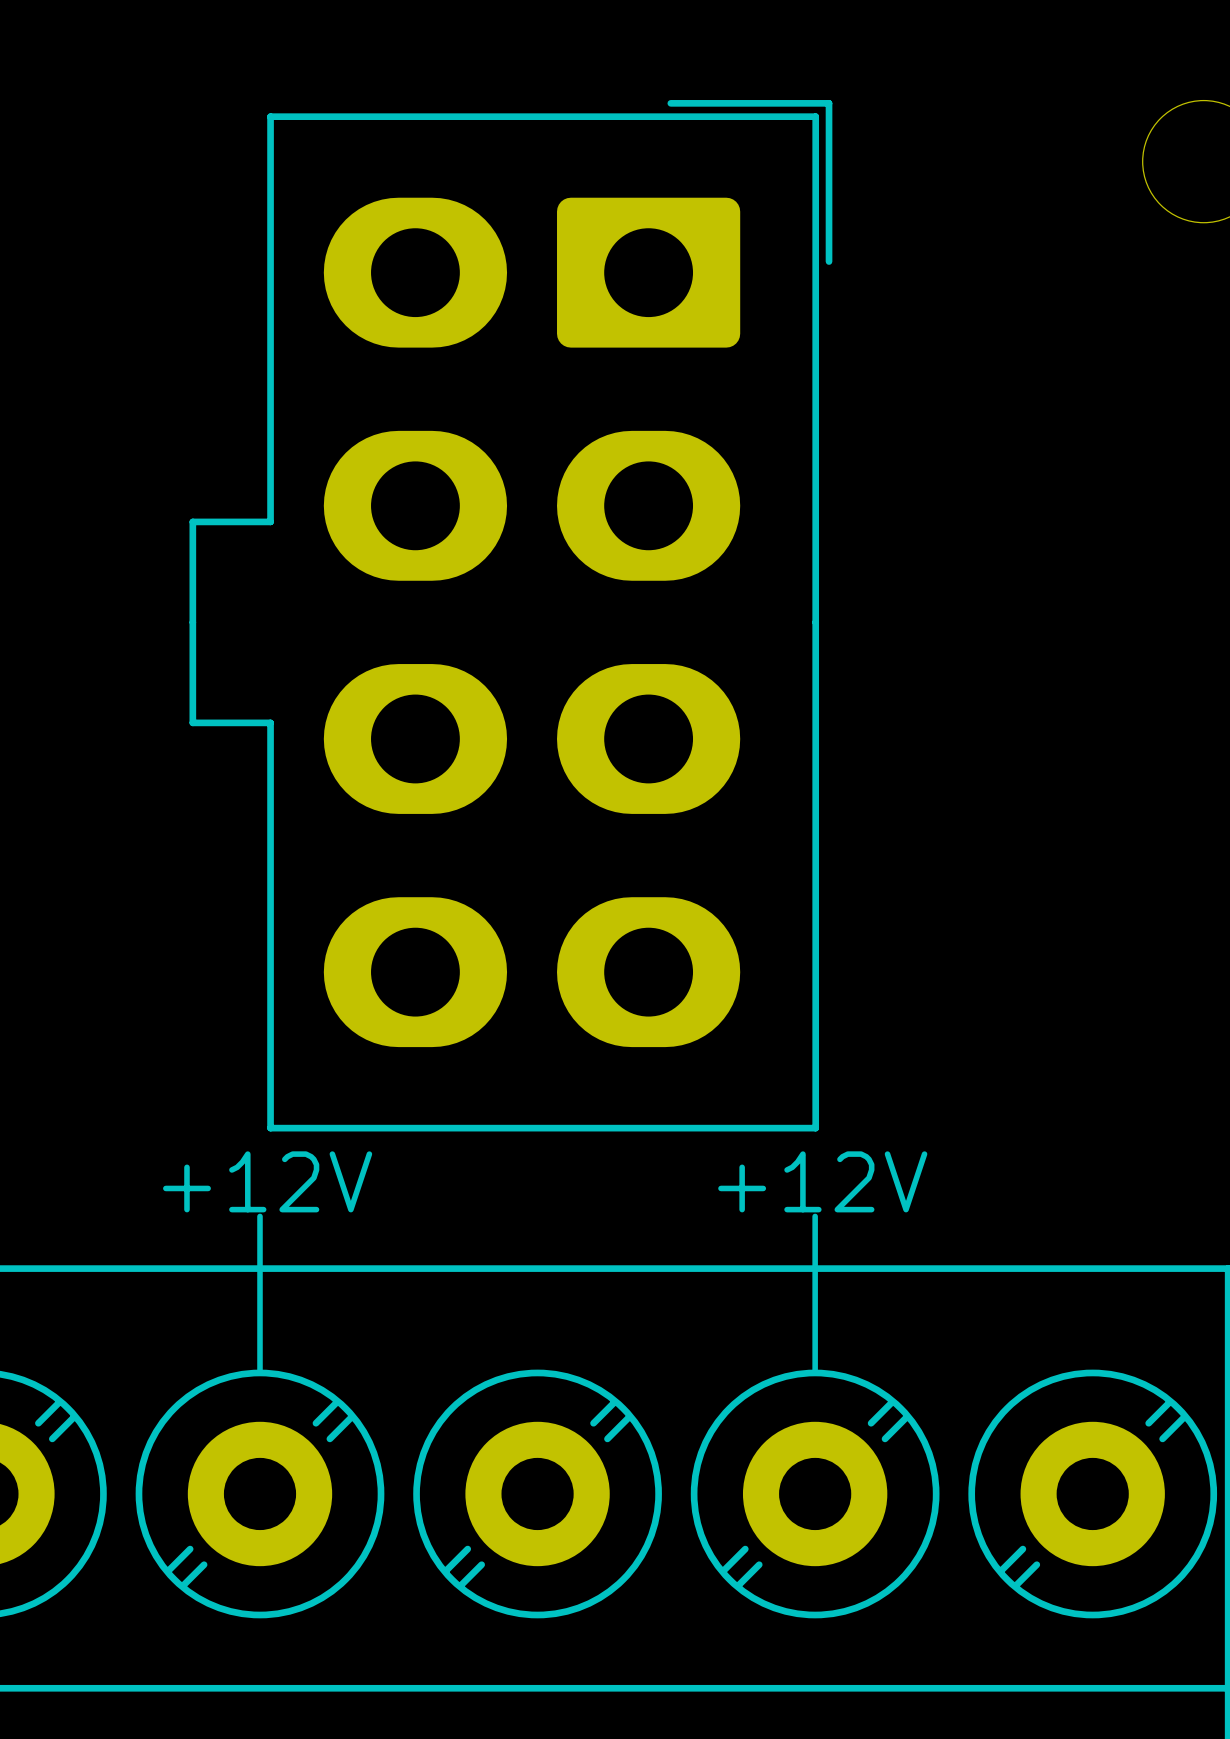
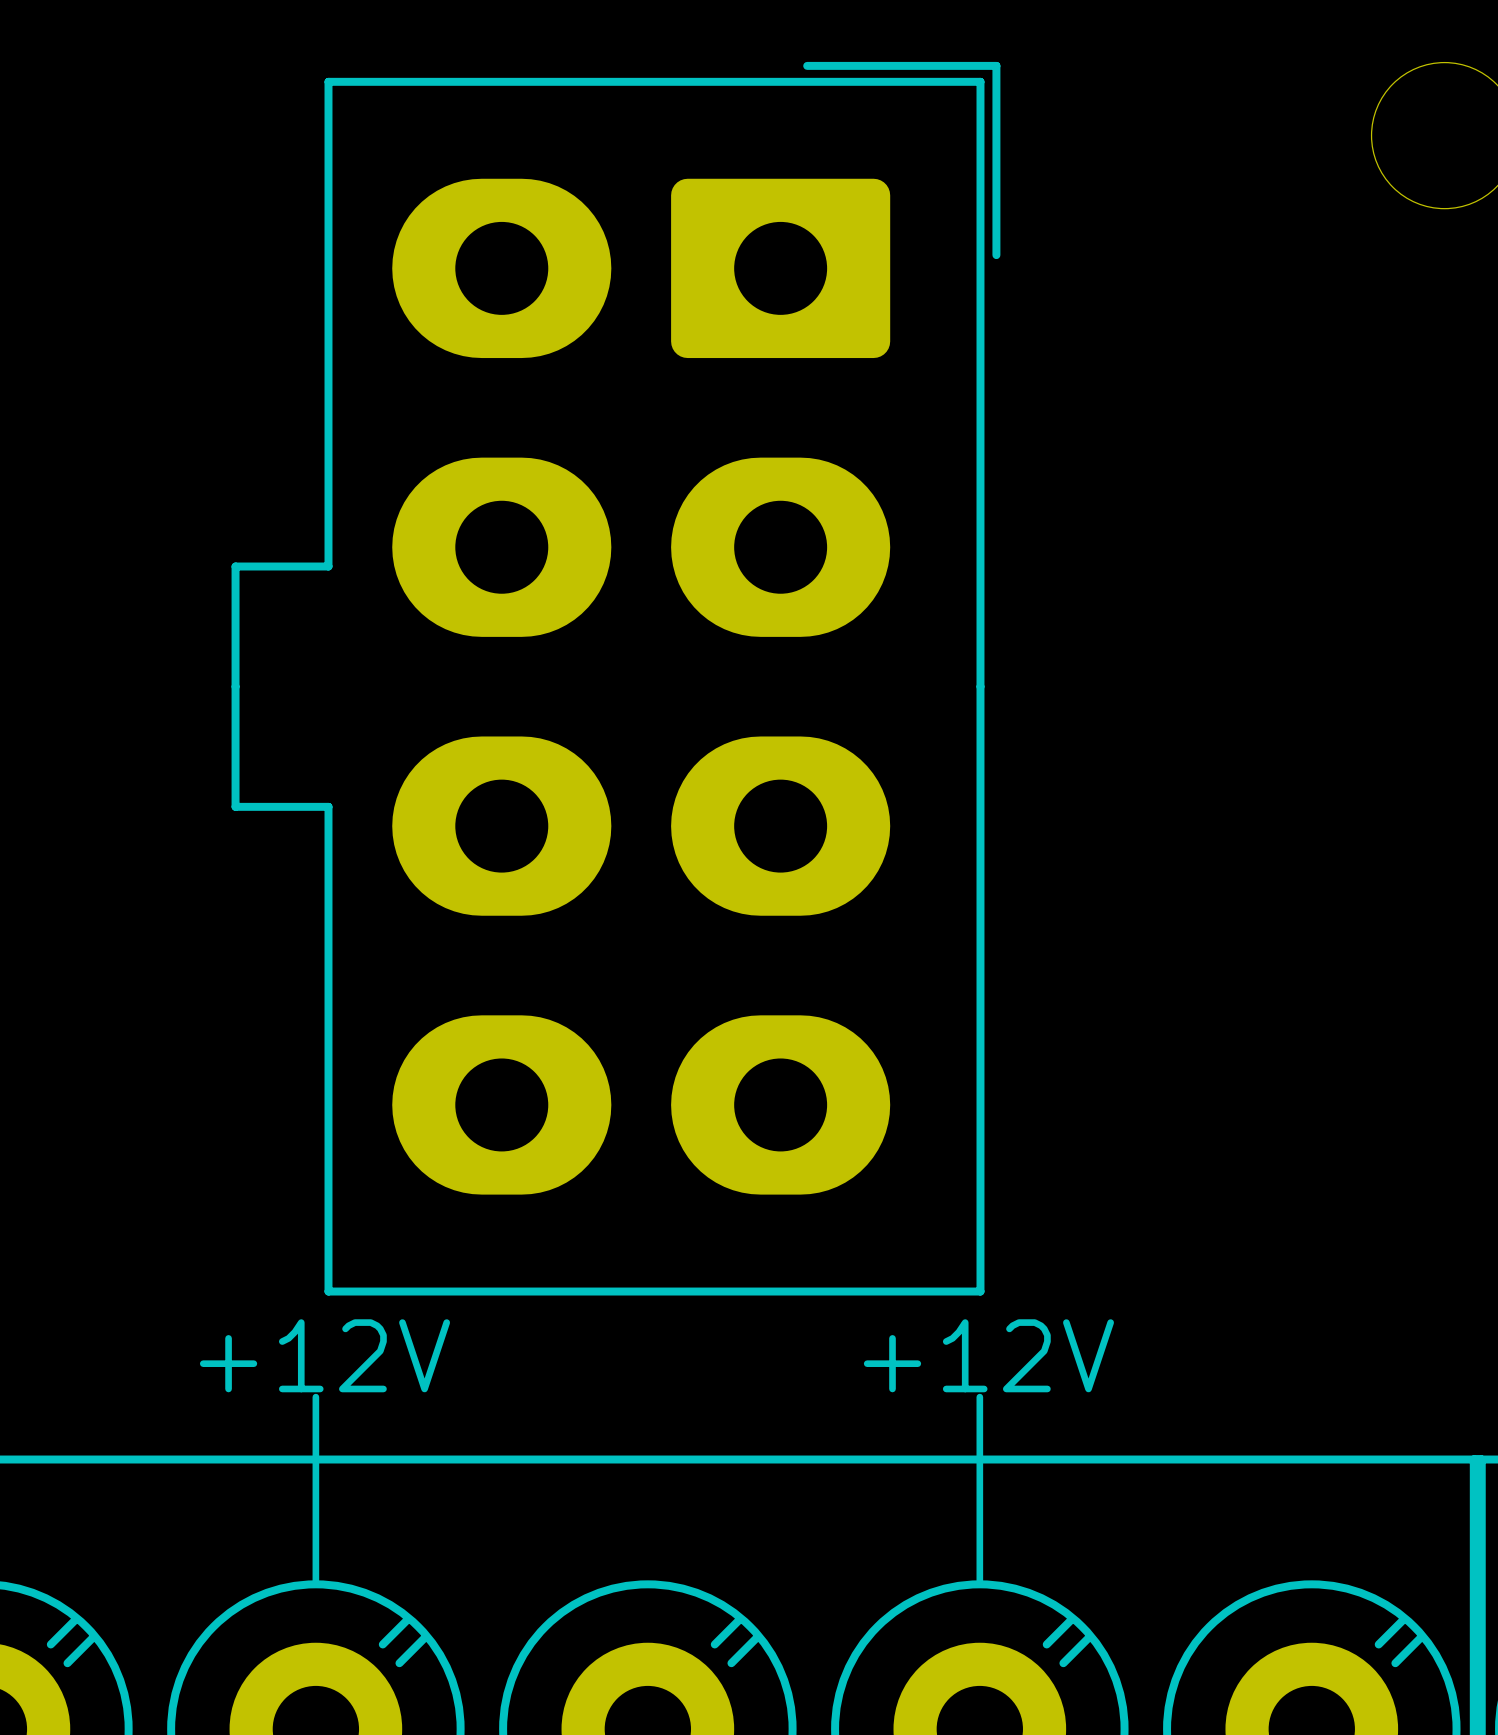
part footprint: [189, 100, 833, 1132] -> [231, 61, 1001, 1296]

